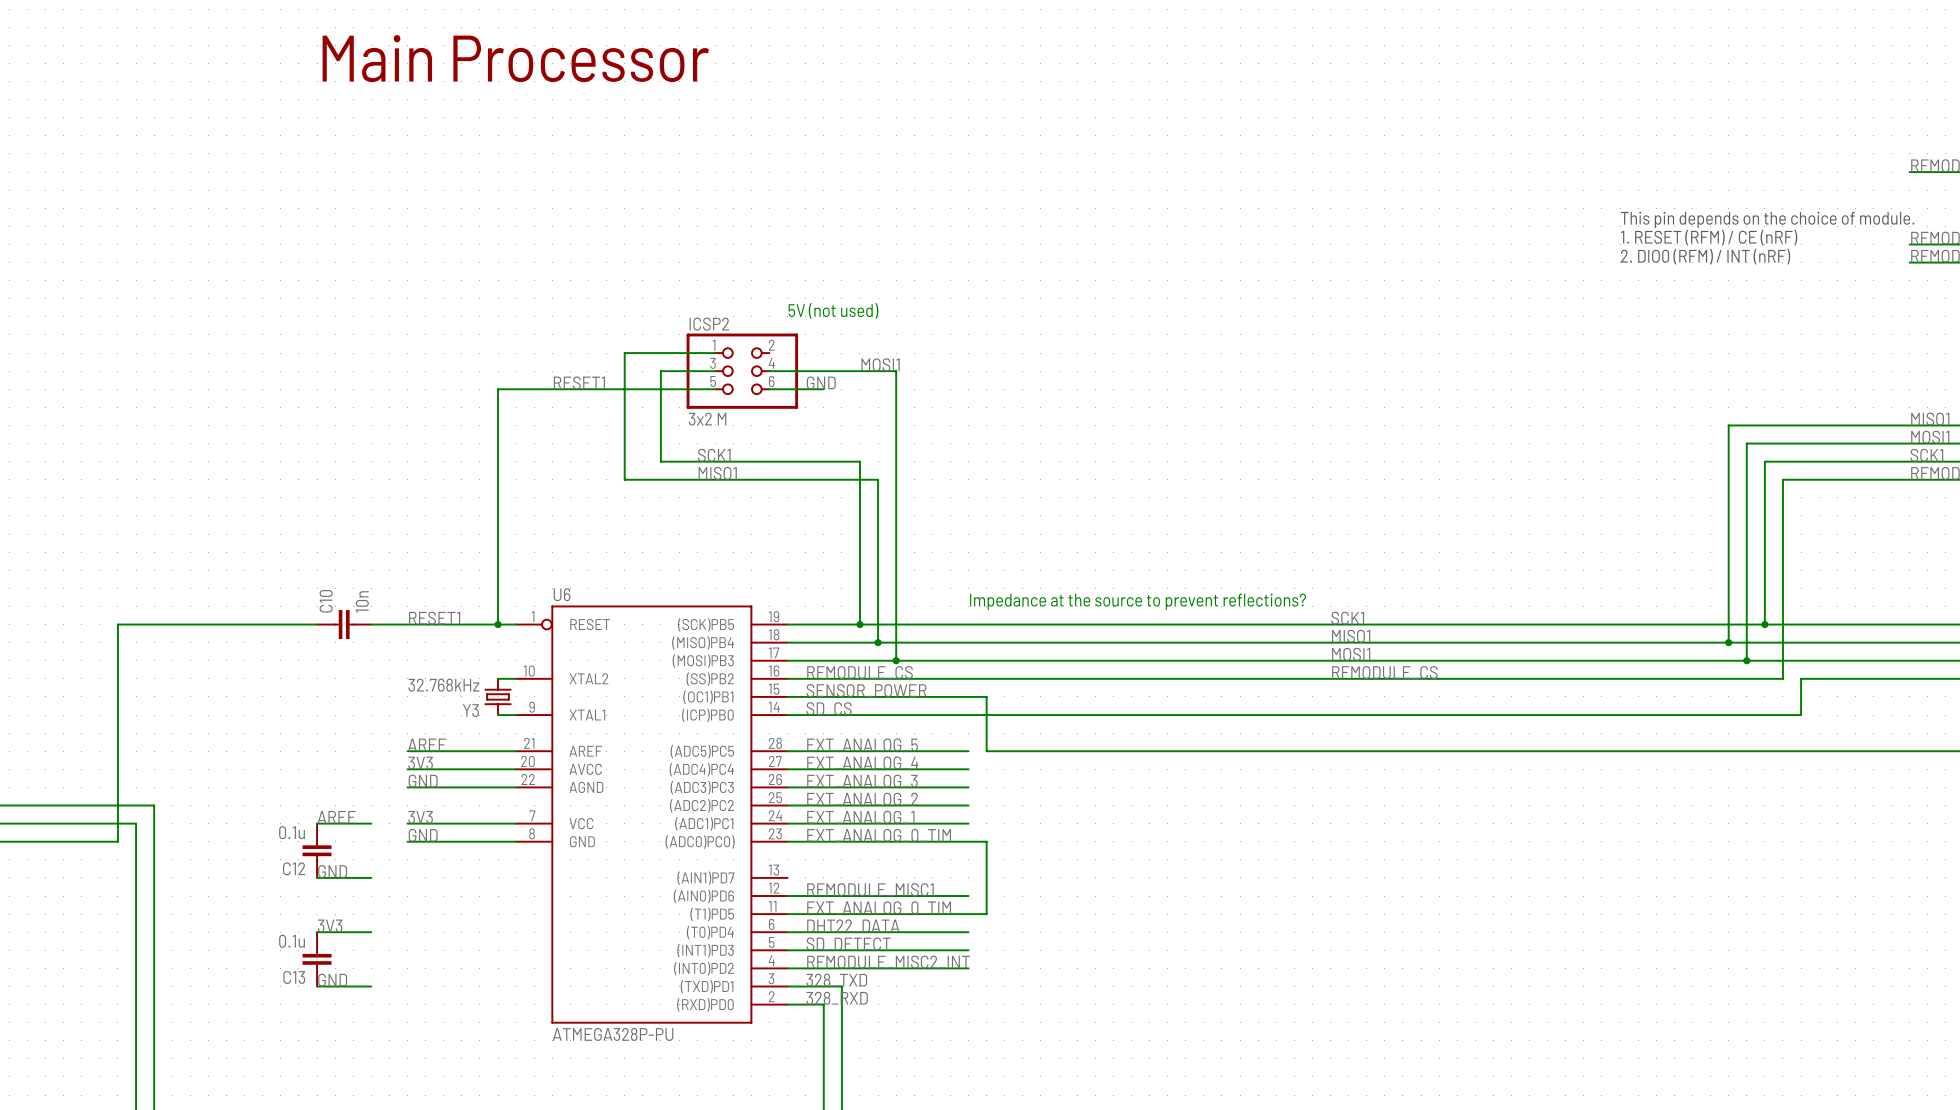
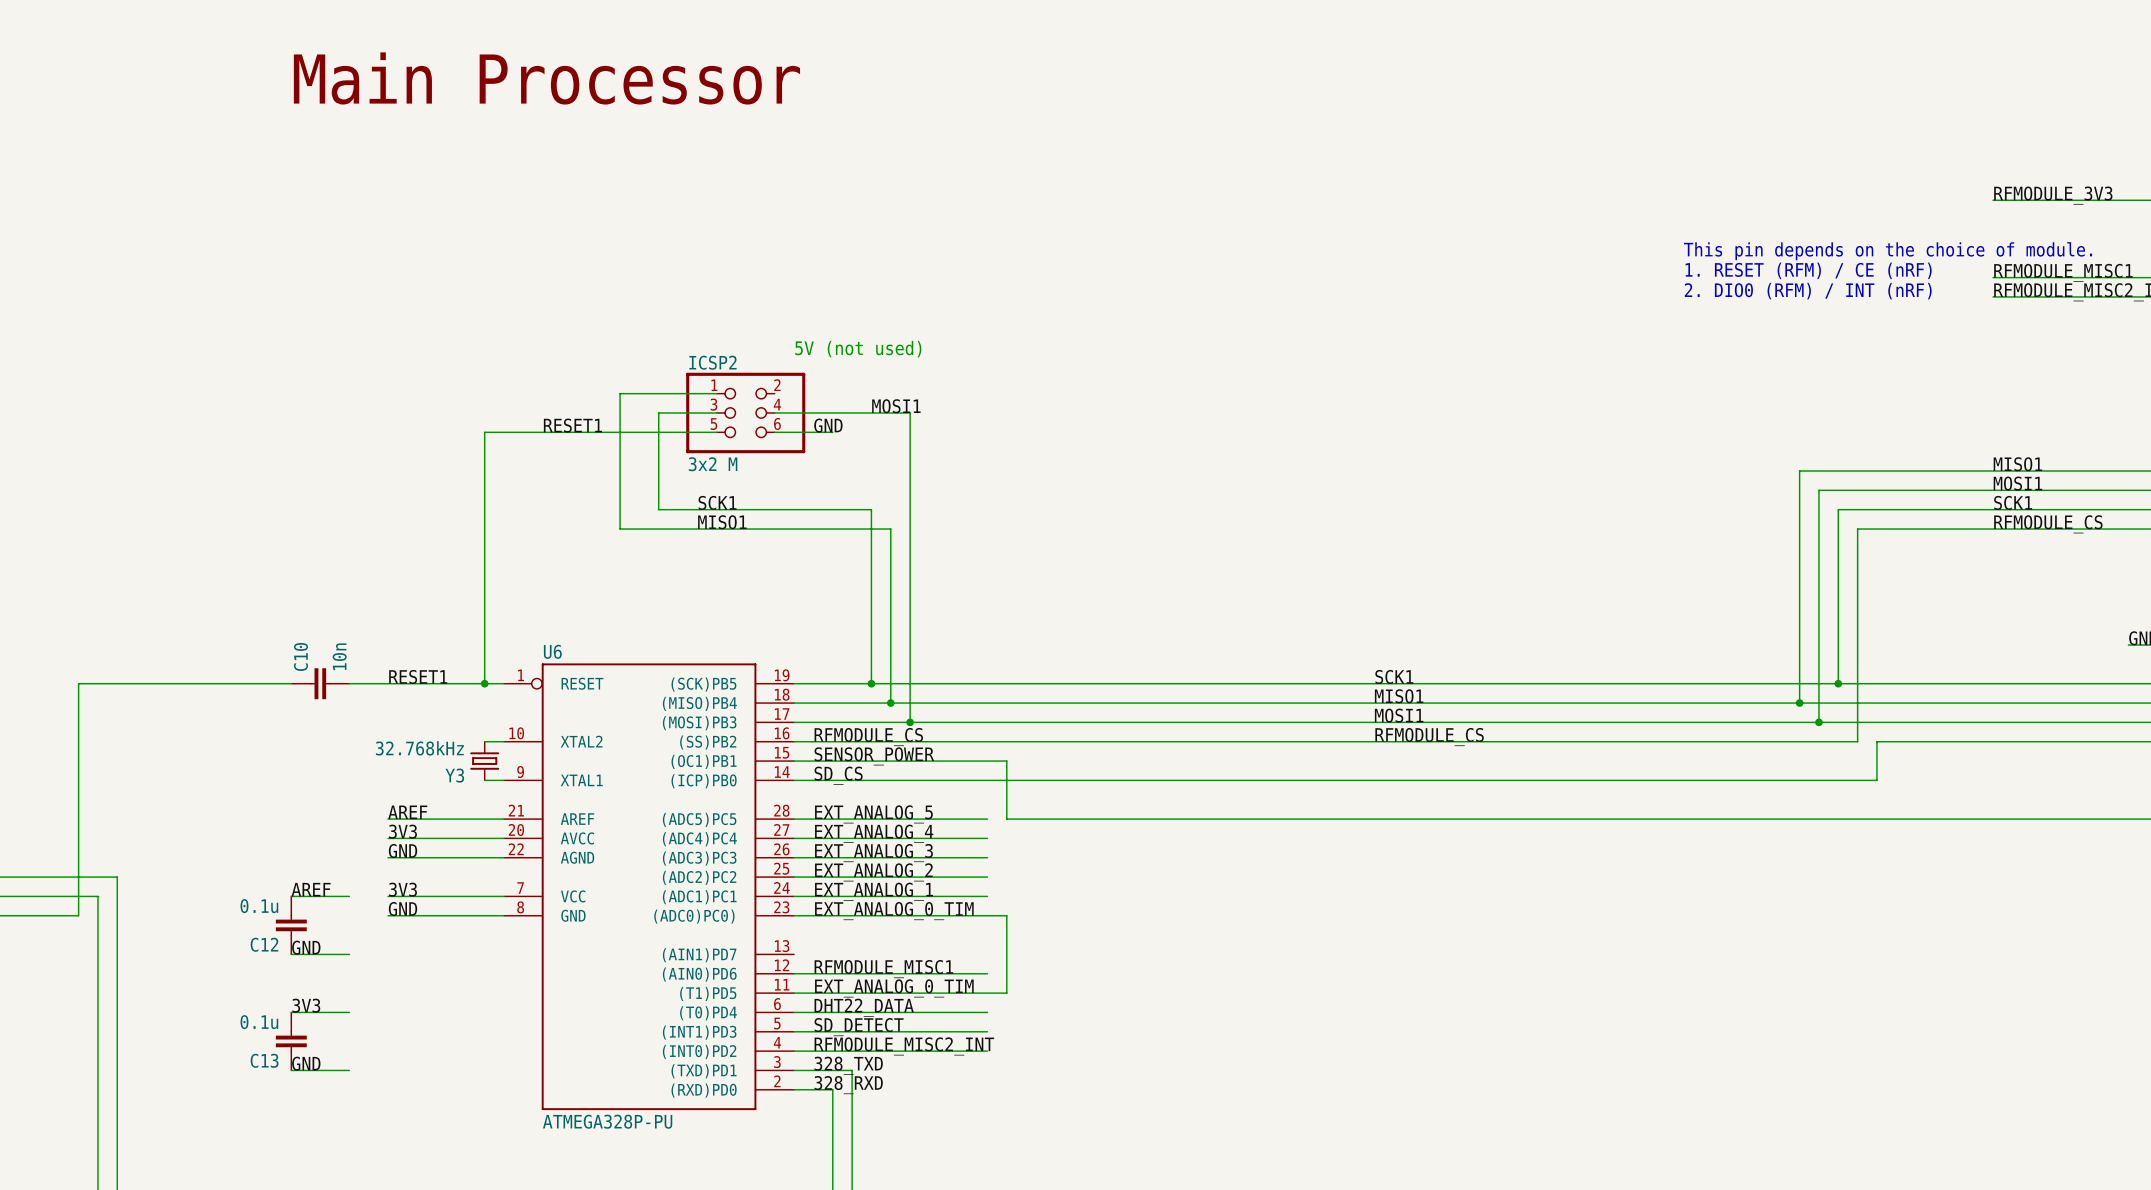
text: Impedance at the source to prevent reflections? (1138, 601) -> none

